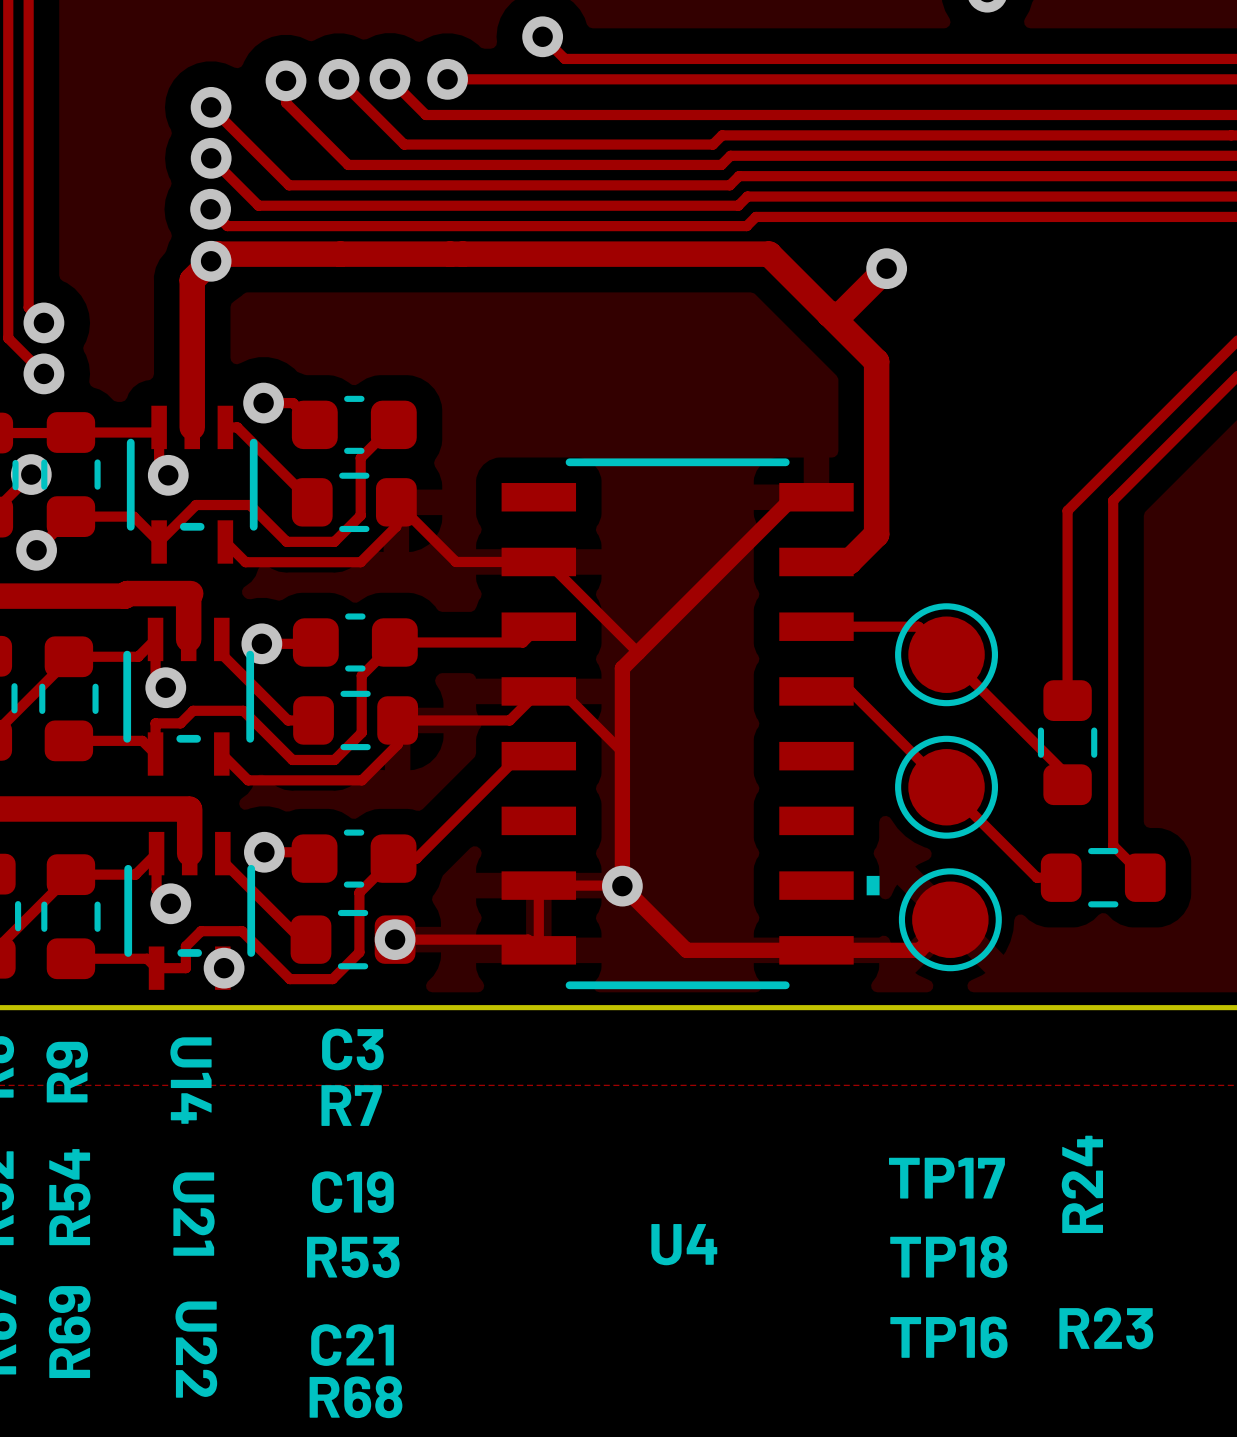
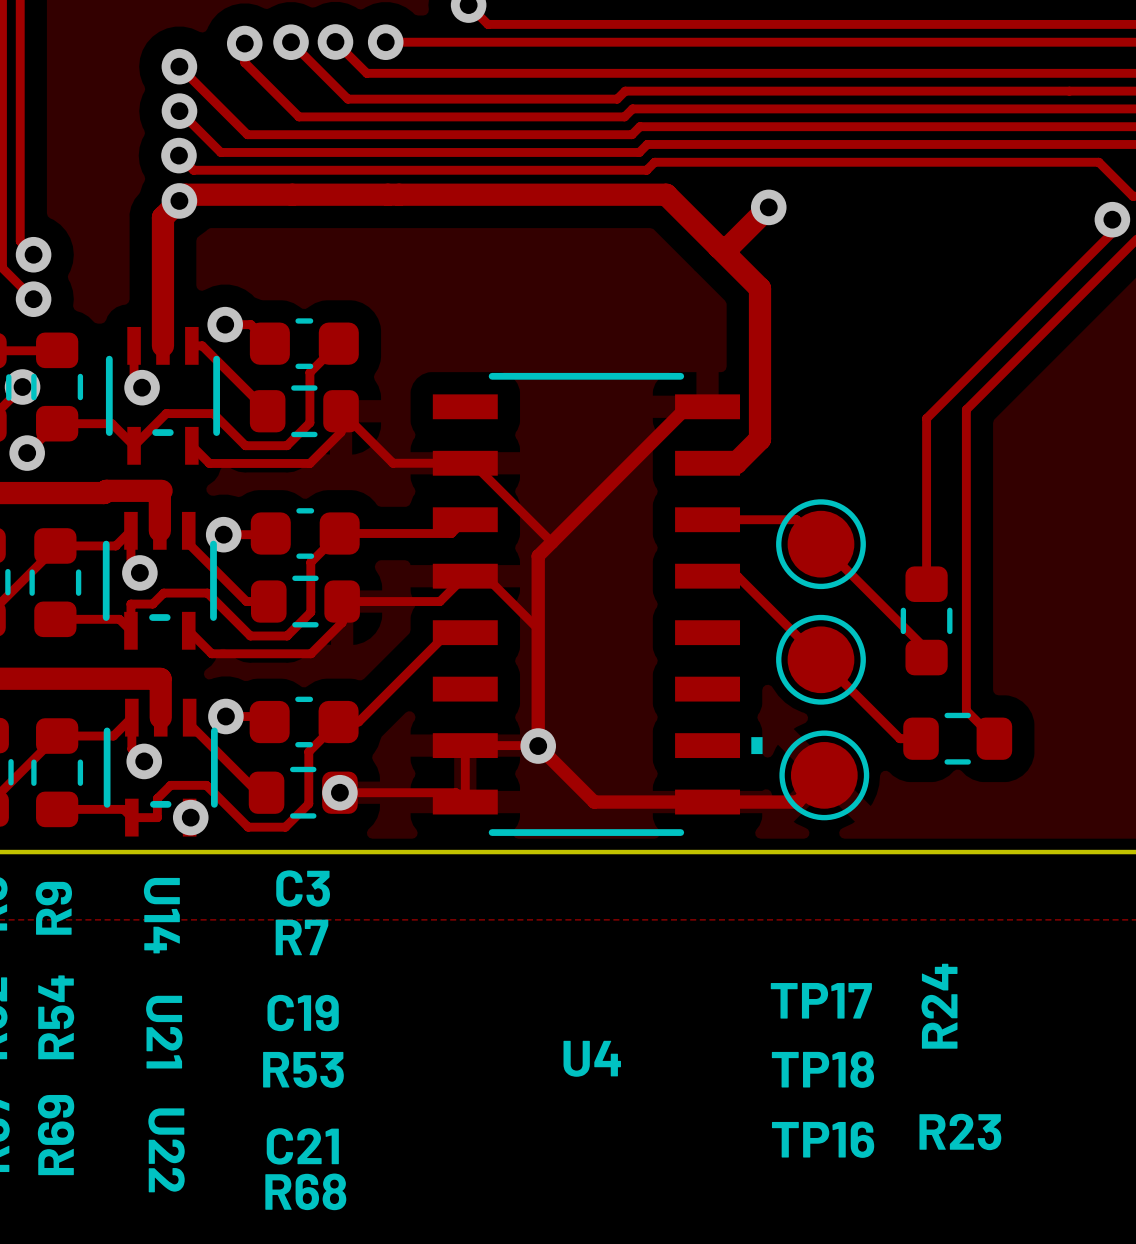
track: (159, 427) (154, 432) (70, 432) -> none

